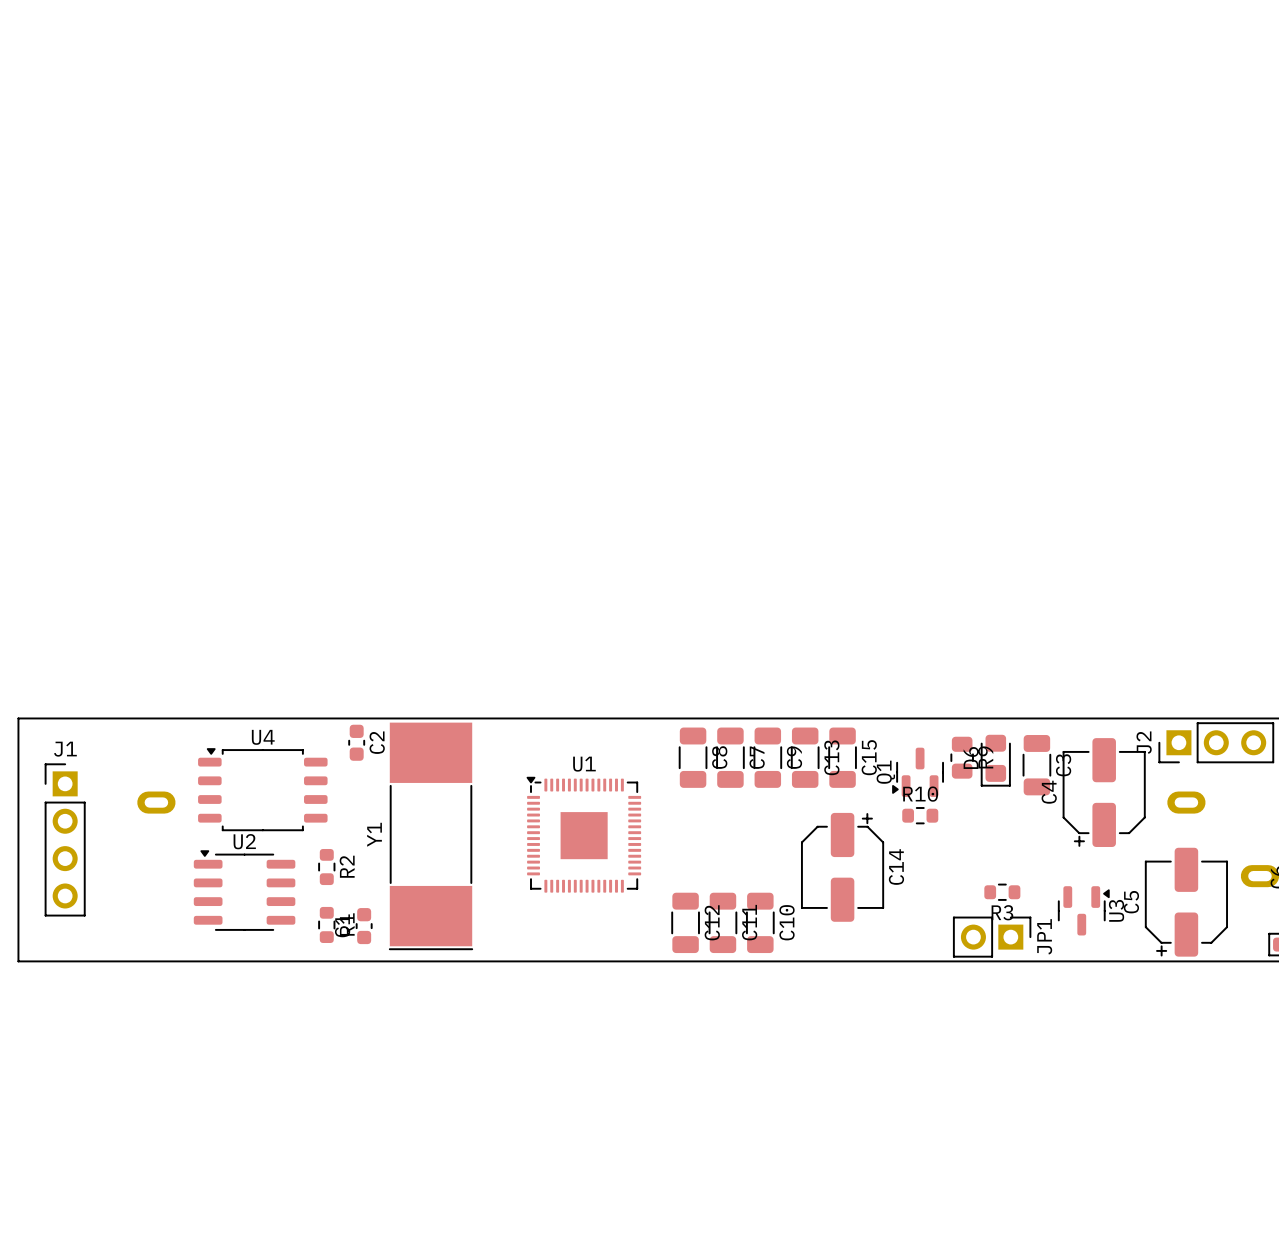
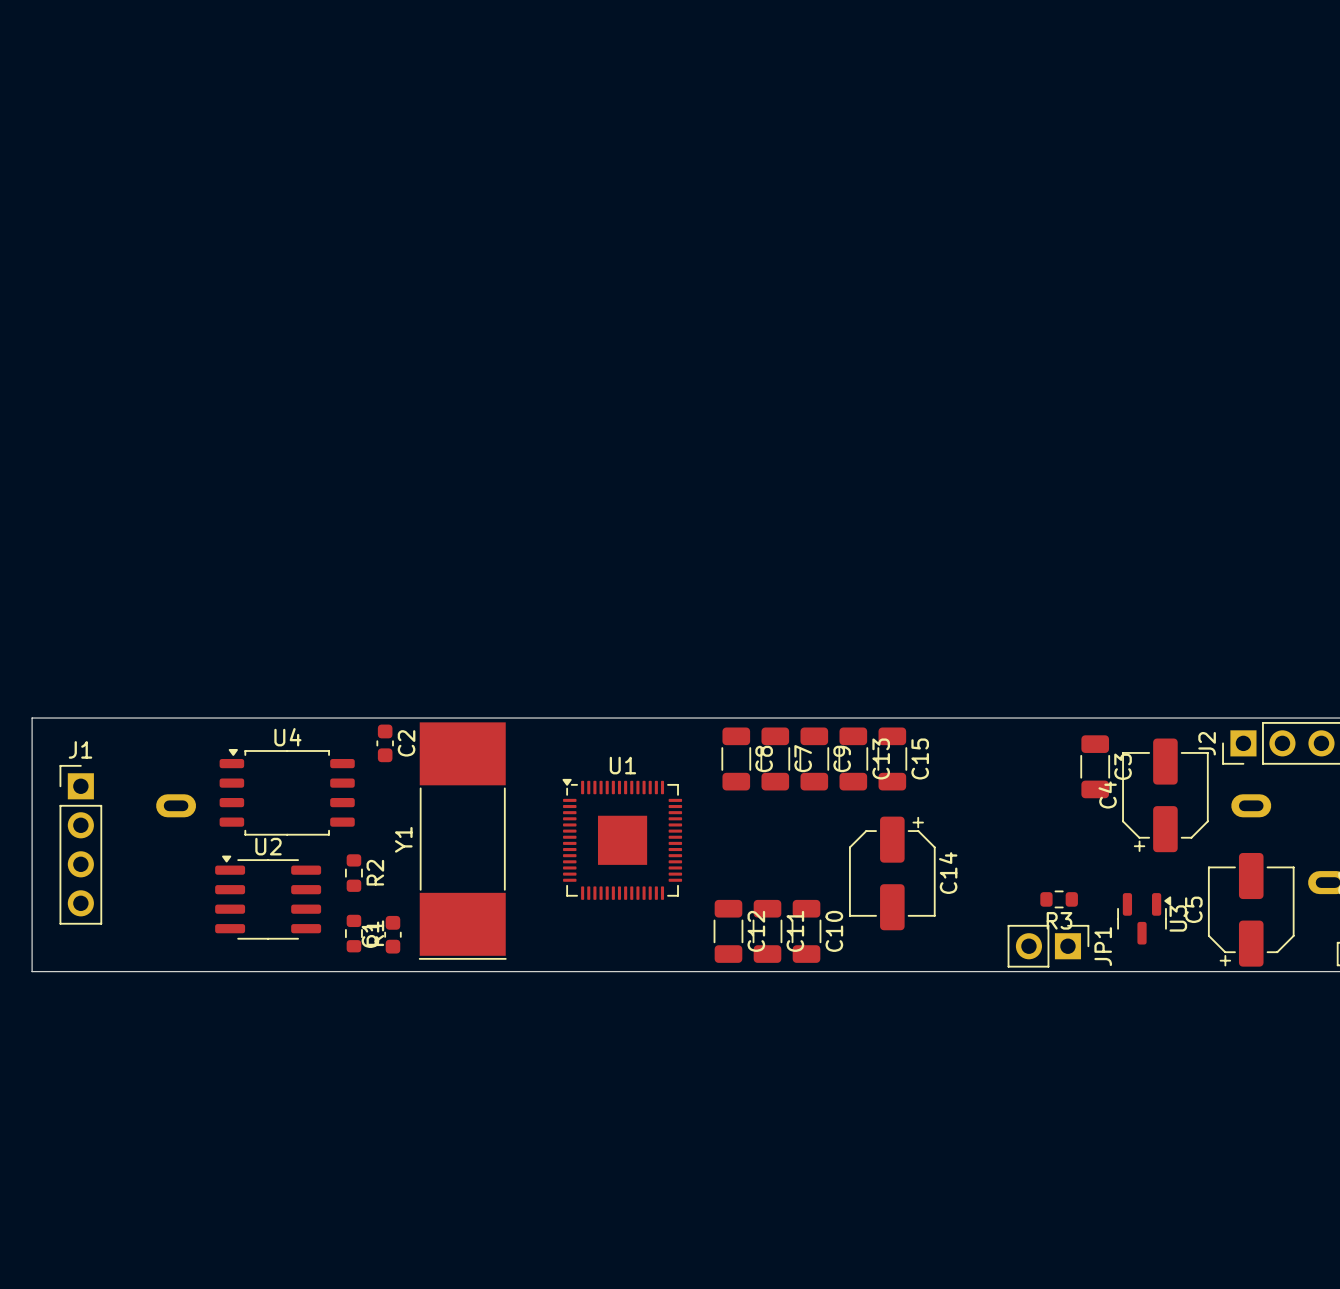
R9: (962, 757) -> none
D6: (995, 760) -> none
Q1: (918, 772) -> none
R10: (920, 815) -> none

